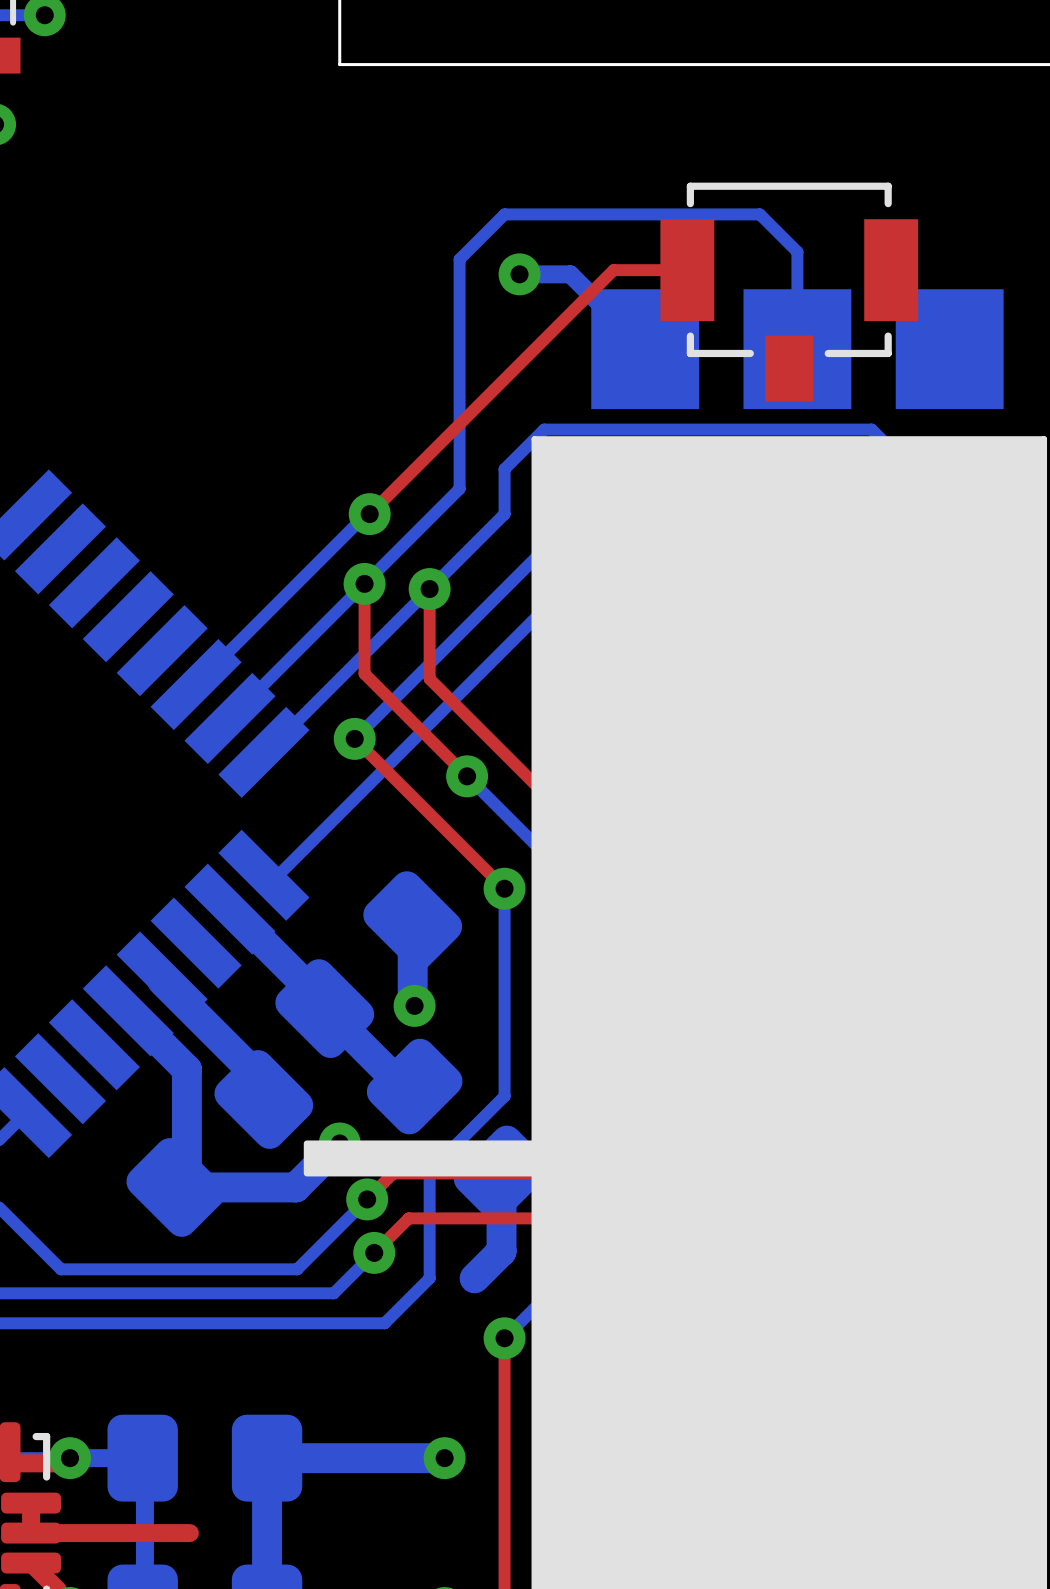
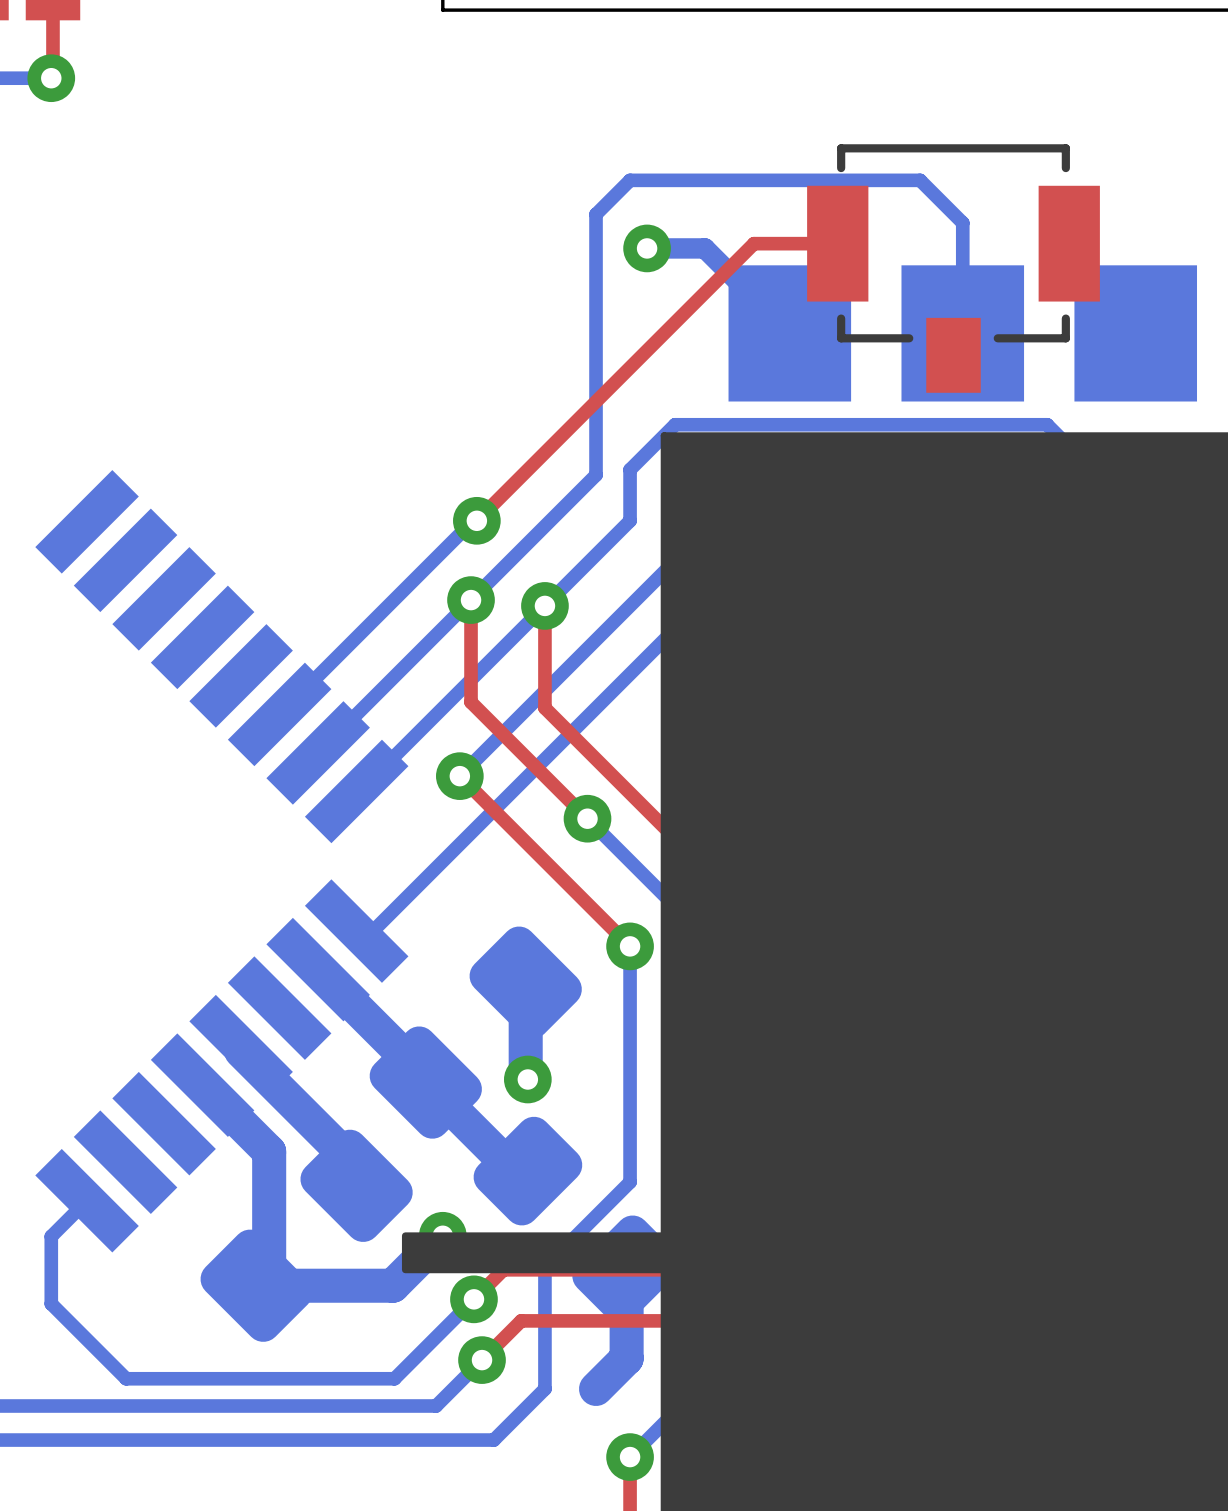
bottom track: (474, 244) (459, 259) (459, 488) -> (596, 214) (596, 475) (578, 492)

